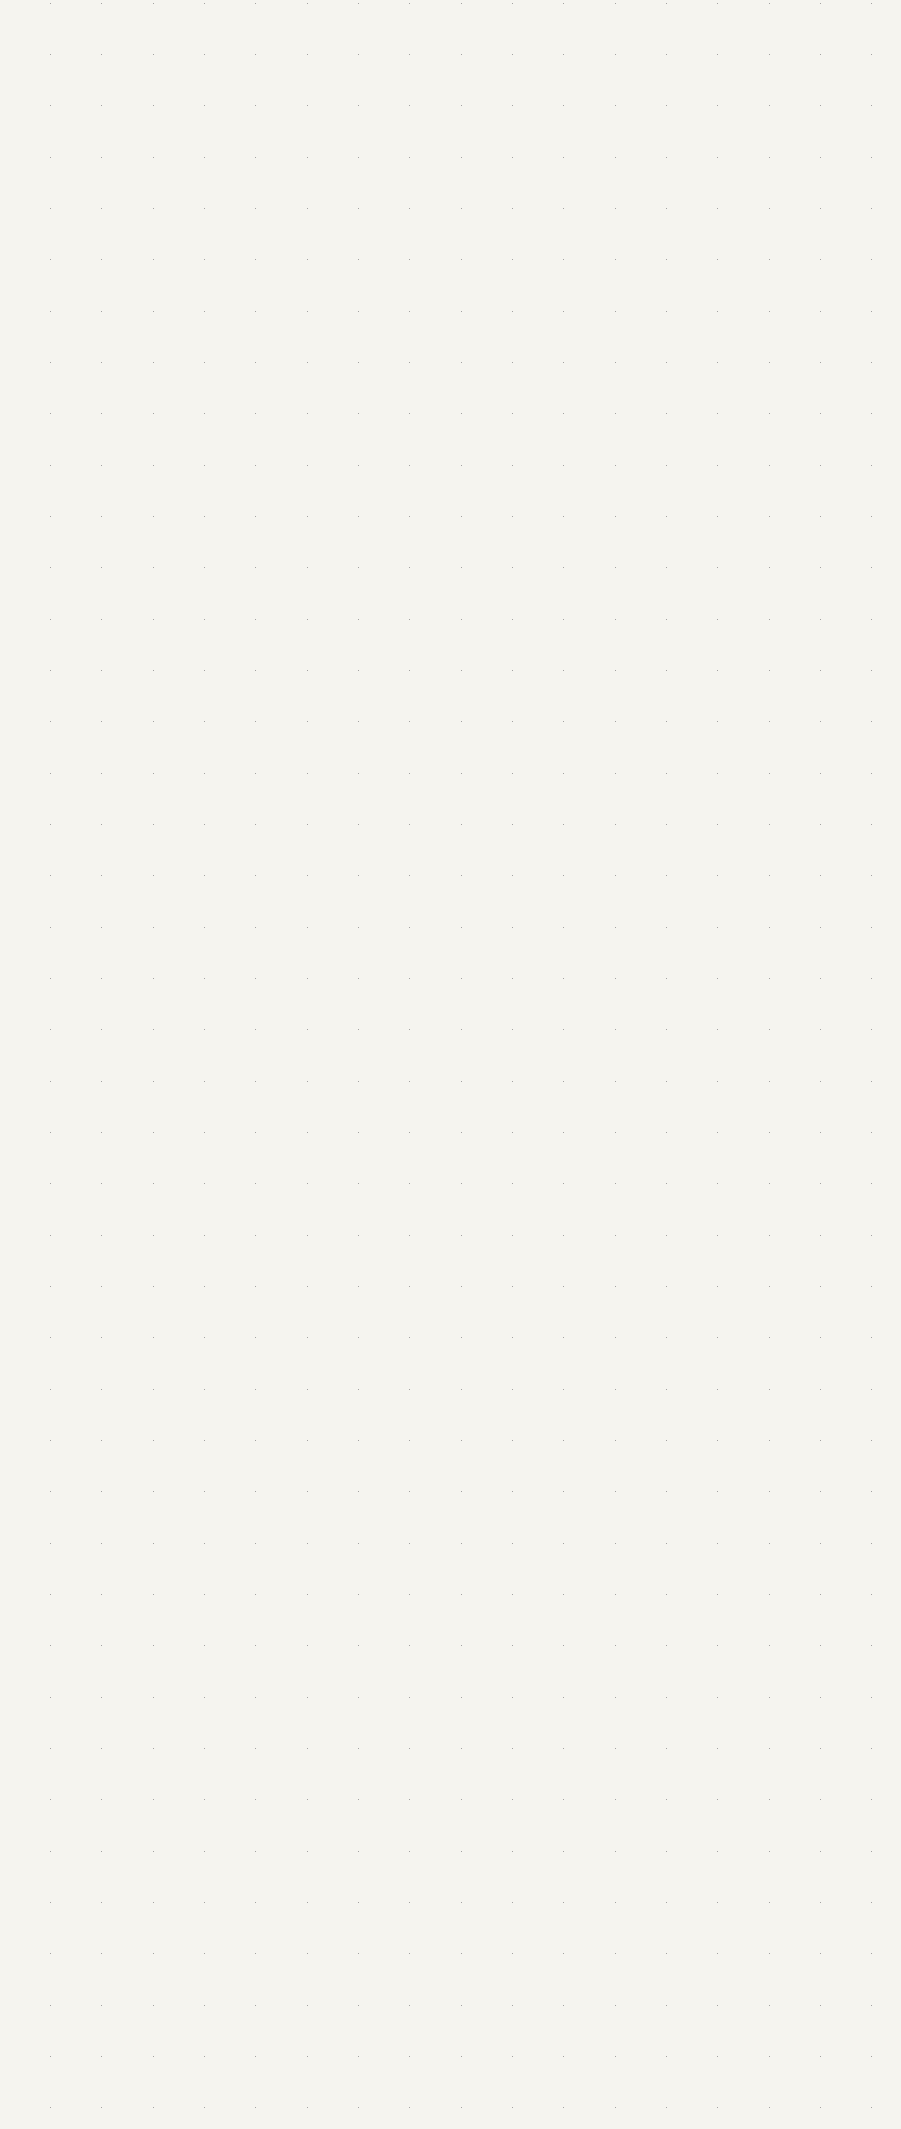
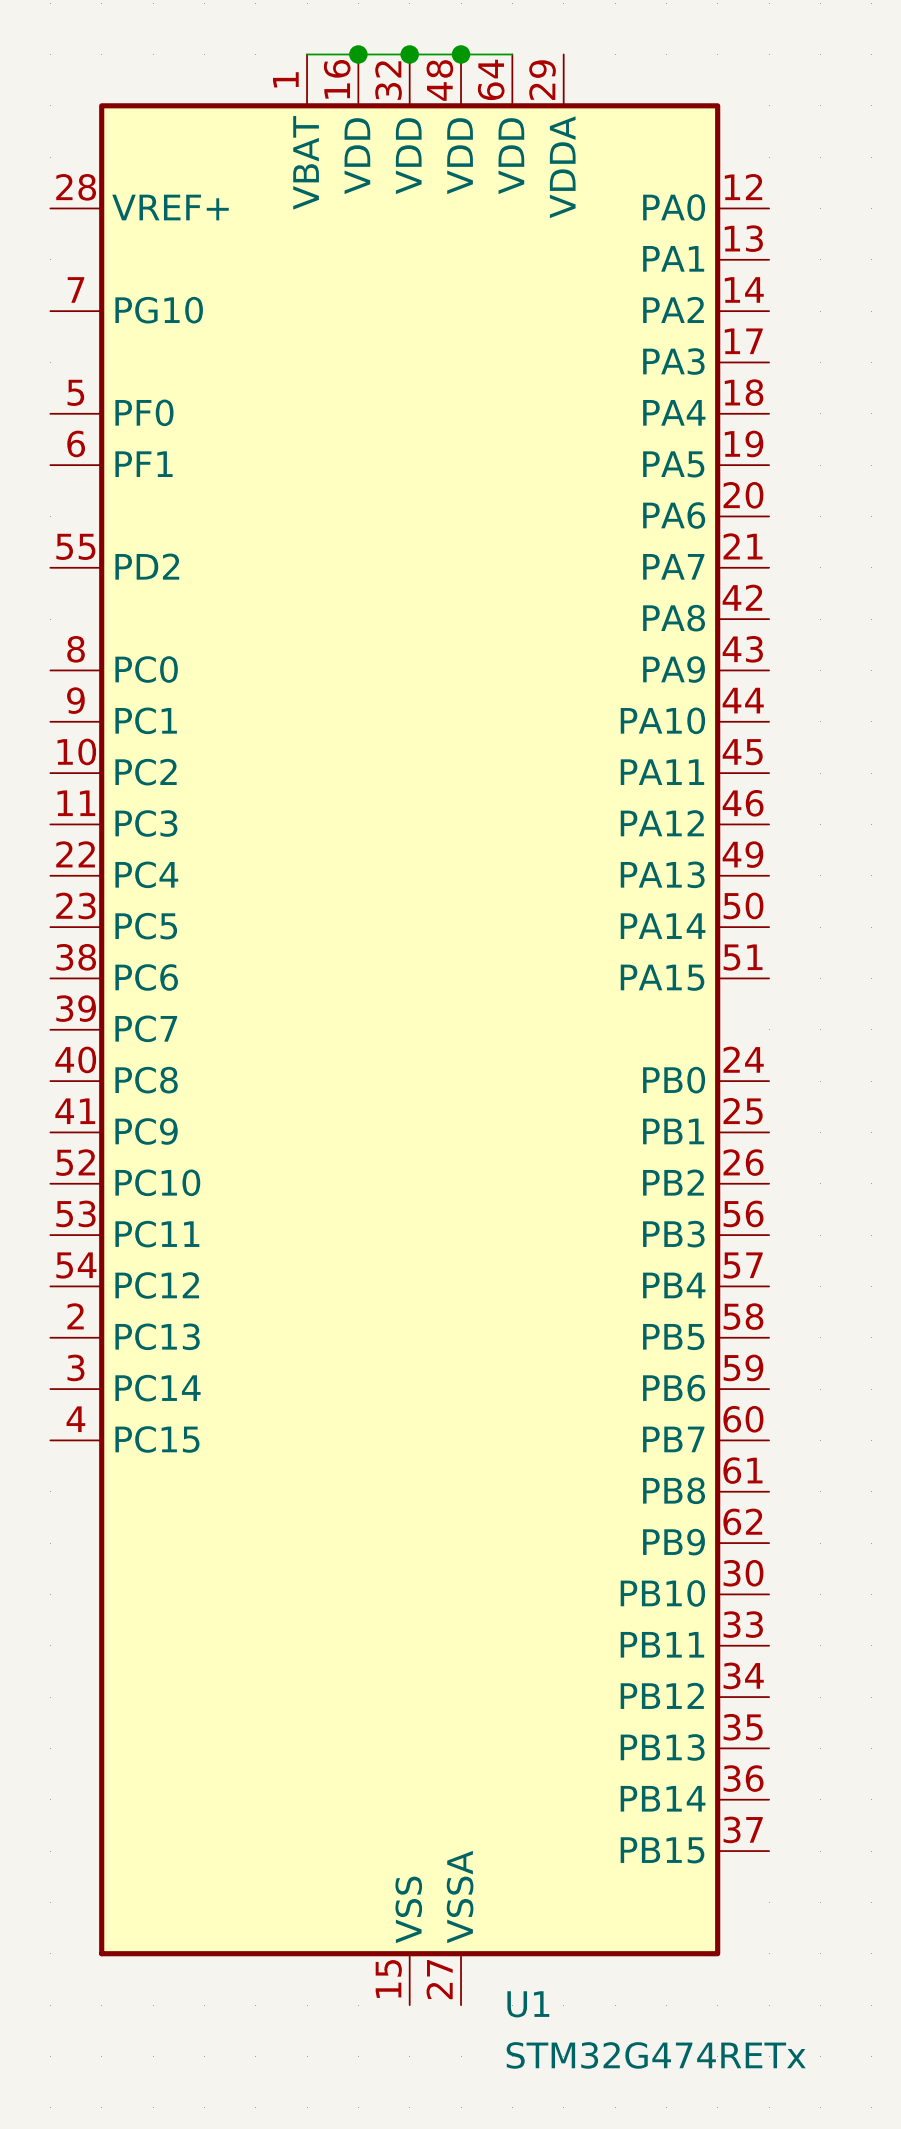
wire: none -> (307, 54) (512, 54)
junction: none -> (358, 54)
junction: none -> (409, 54)
junction: none -> (461, 54)
U1: none -> STM32G474RETx (409, 1029)

